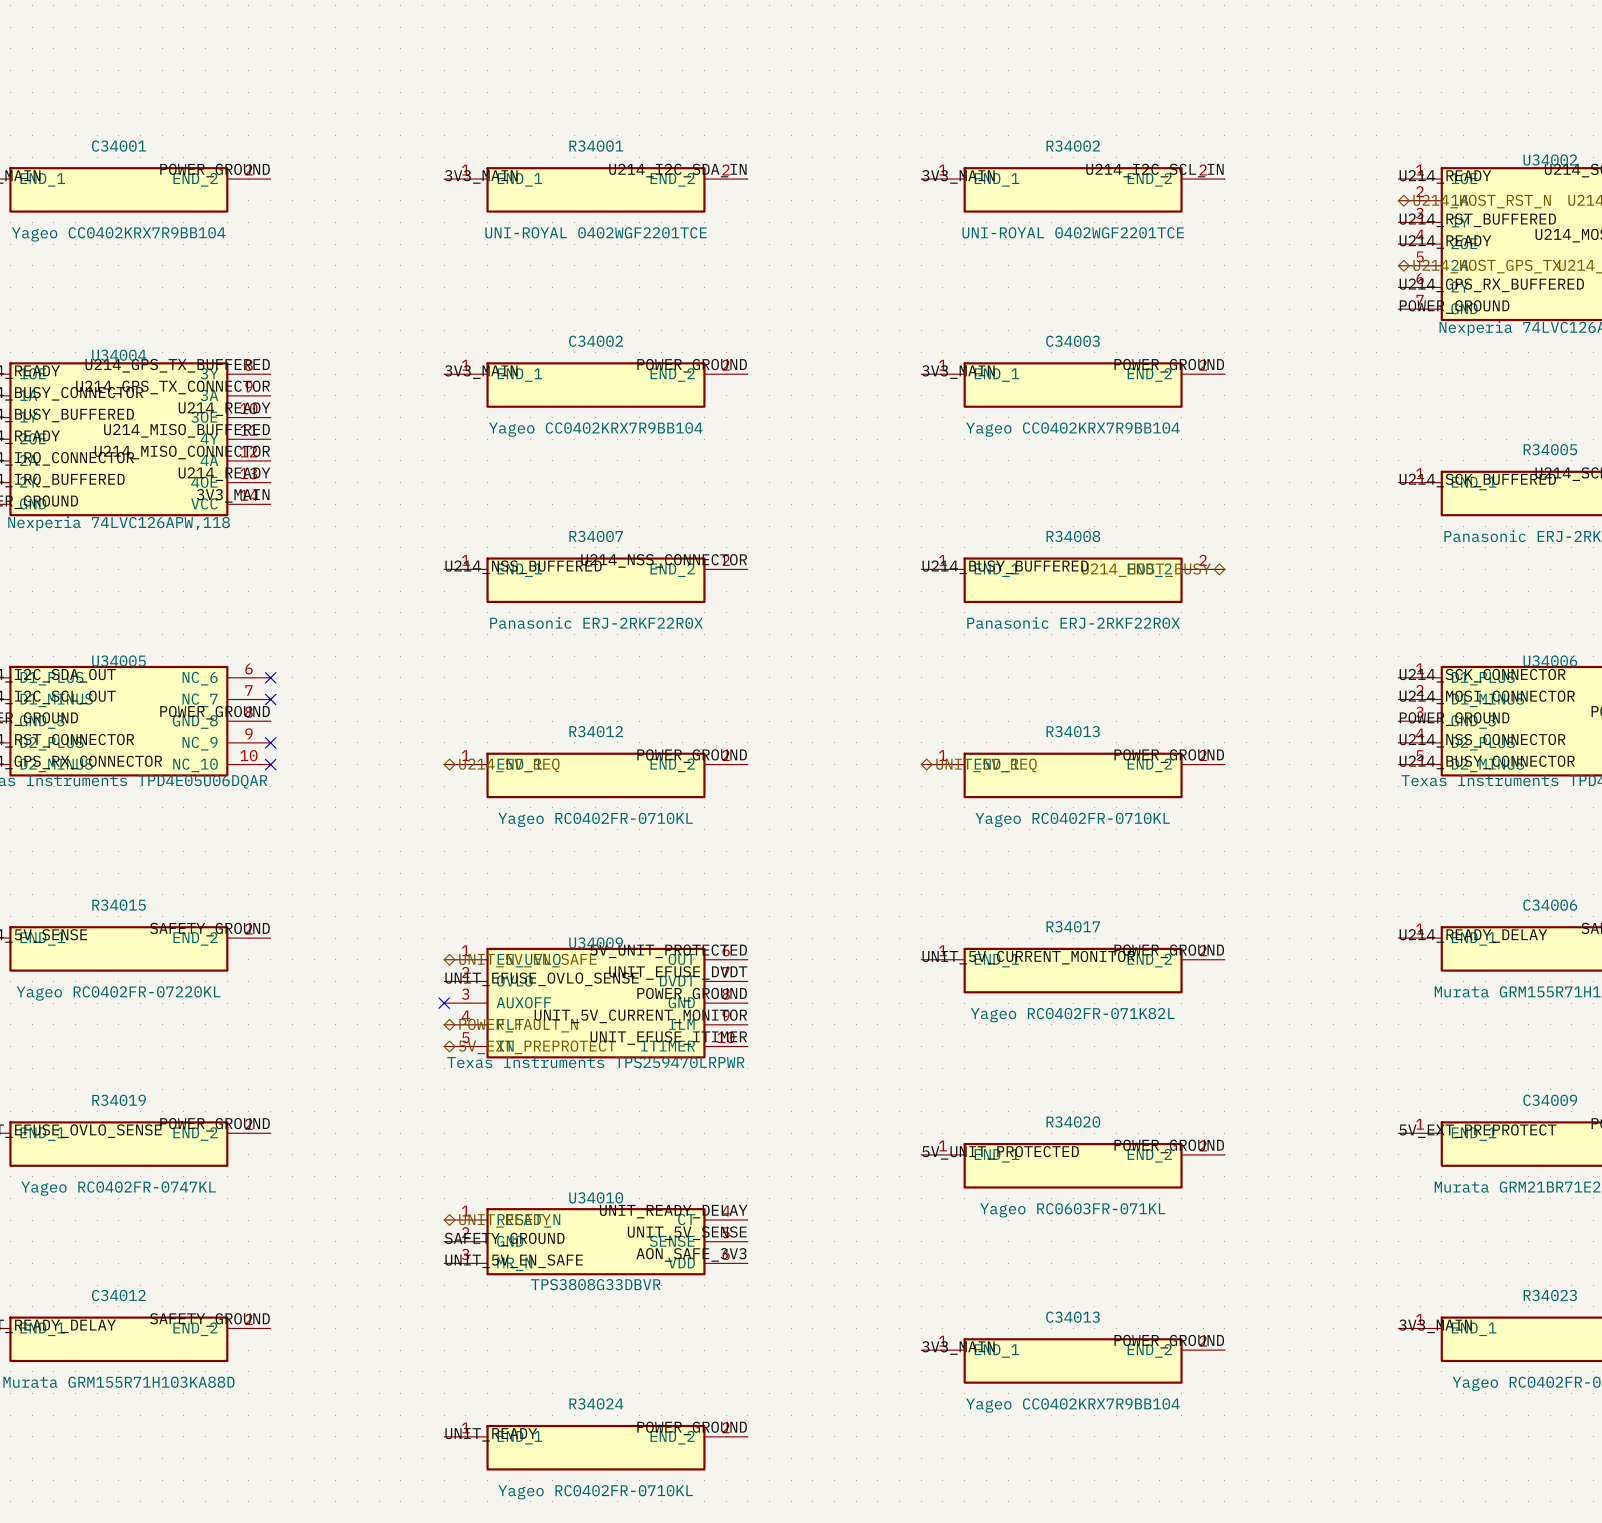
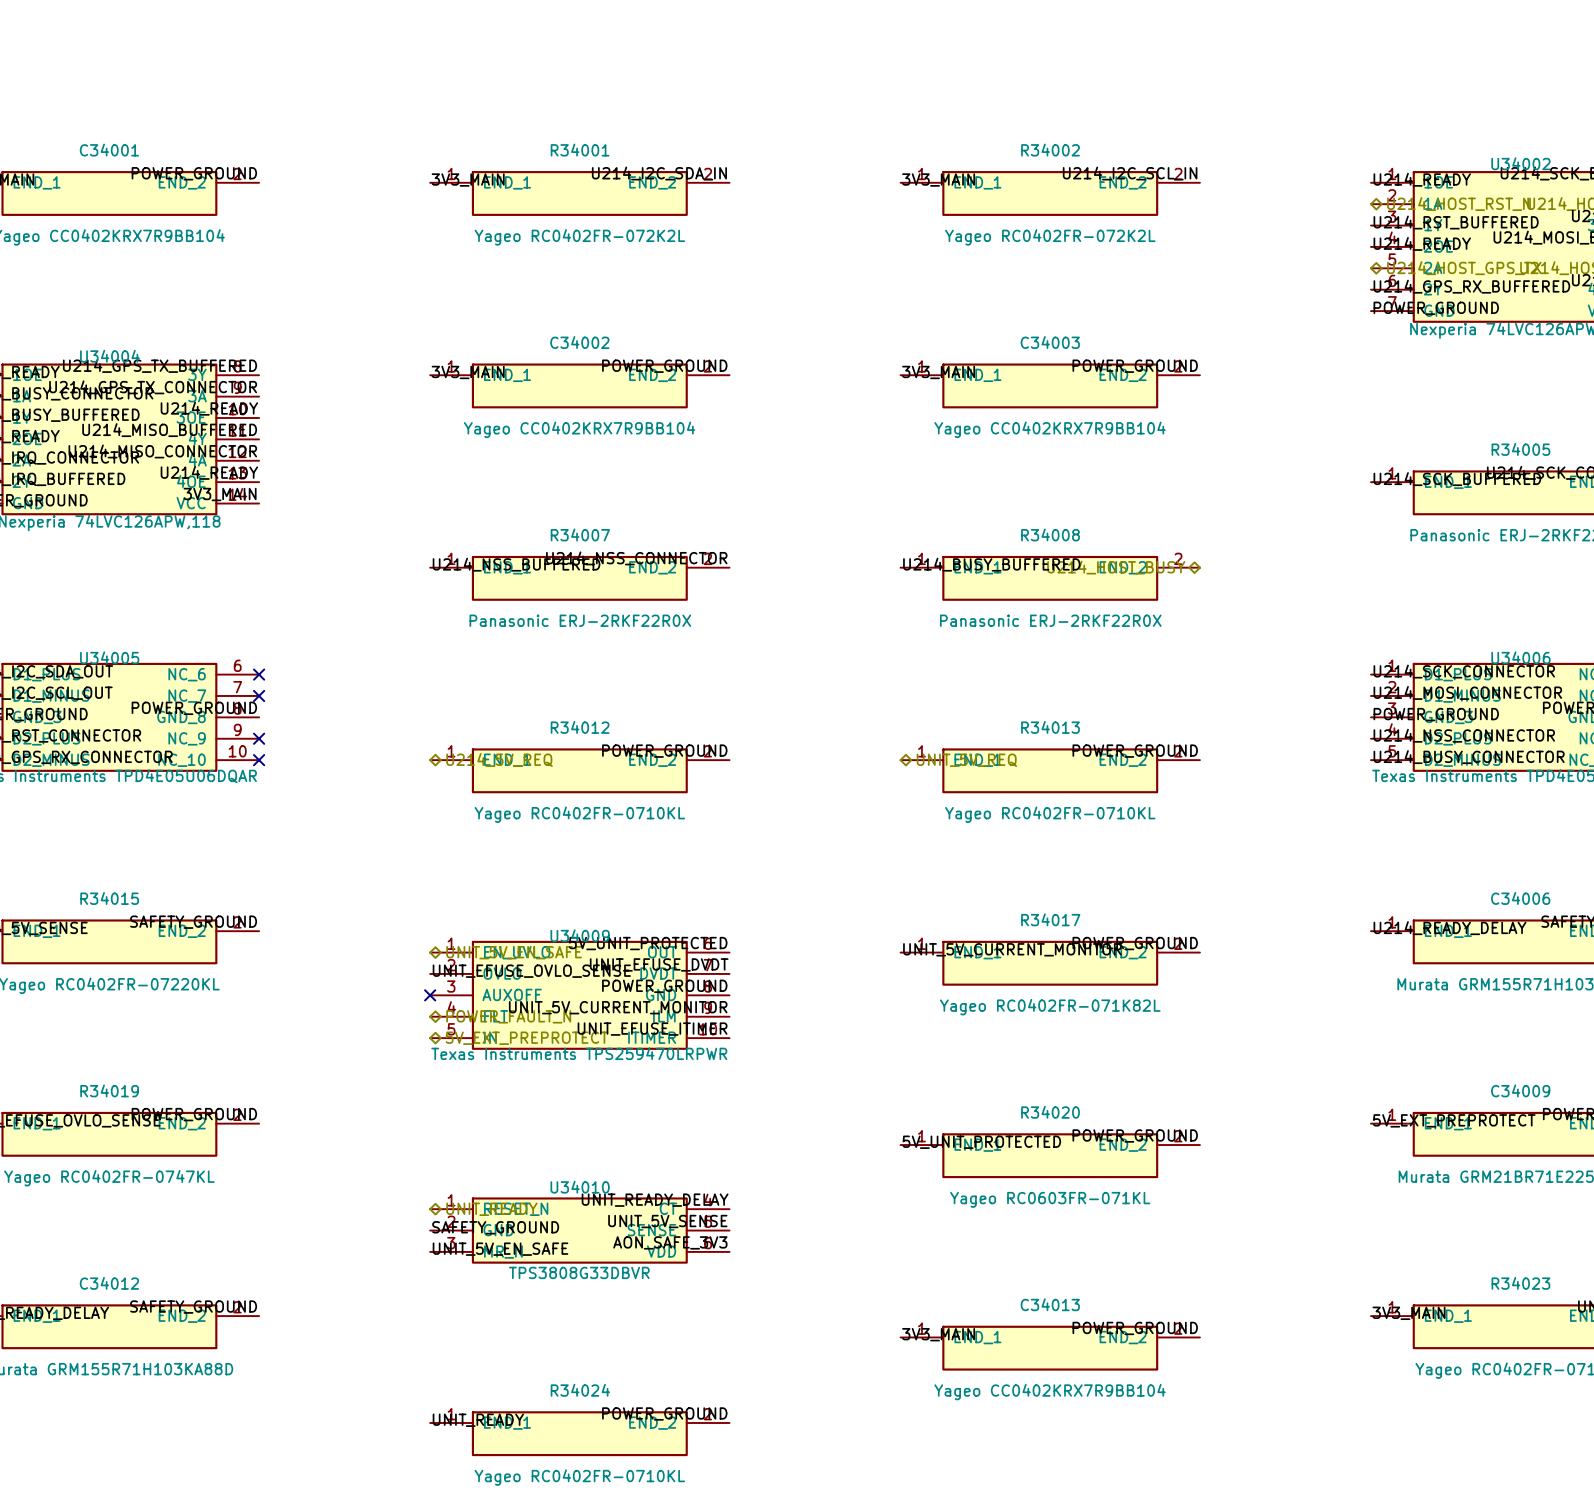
R34001 value: UNI-ROYAL 0402WGF2201TCE (595, 232) -> Yageo RC0402FR-072K2L (579, 237)
R34002 value: UNI-ROYAL 0402WGF2201TCE (1073, 232) -> Yageo RC0402FR-072K2L (1050, 237)

